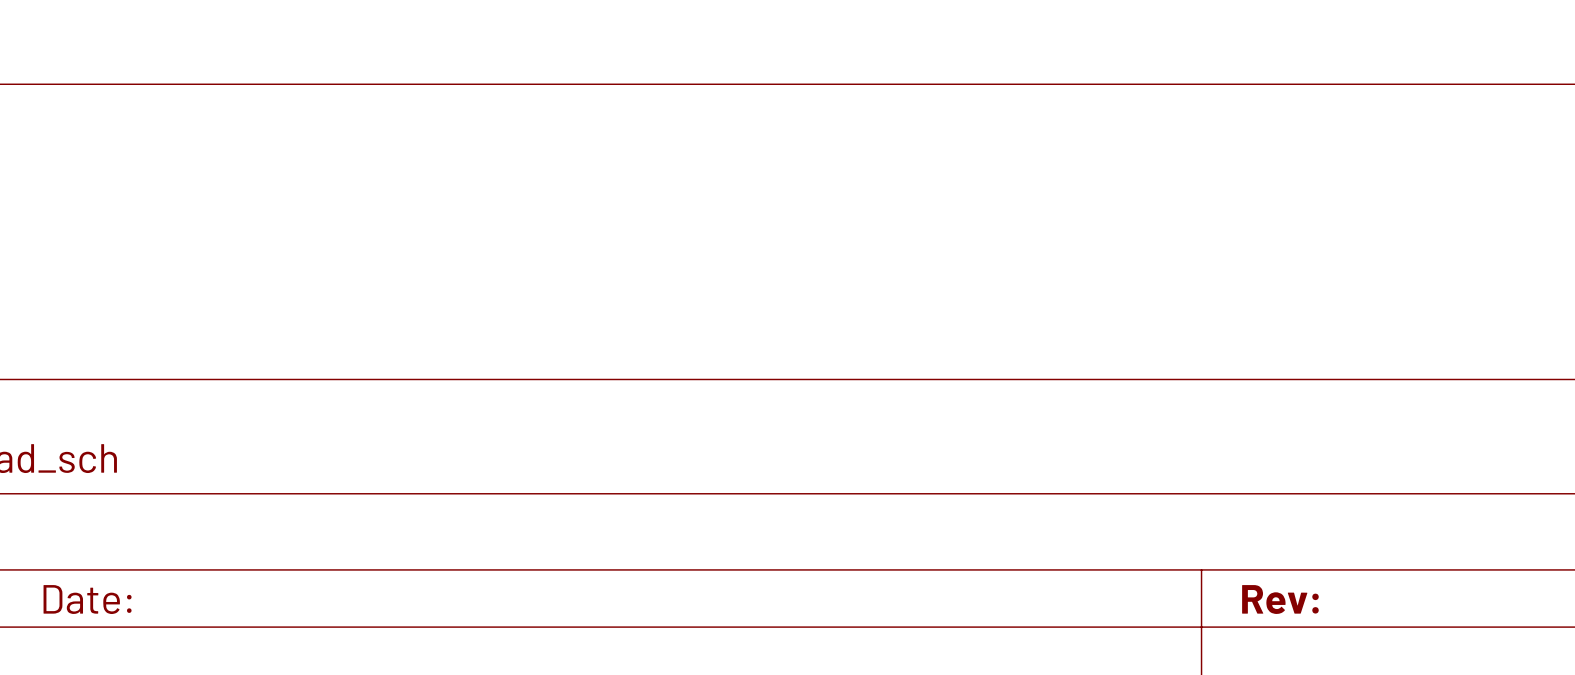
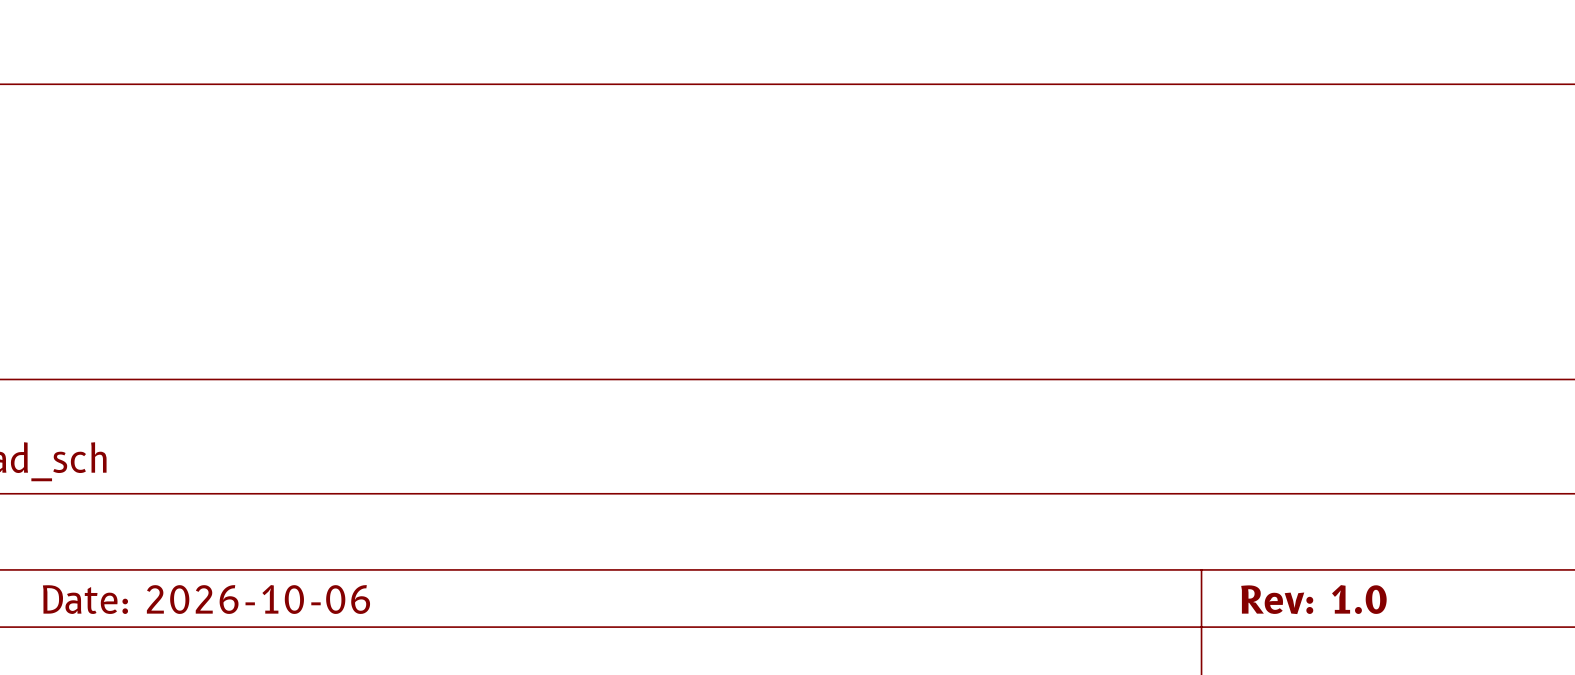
title block: Date: (87, 599) -> Date: 2026-10-06 (206, 599)
title block: Rev: (1280, 599) -> Rev: 1.0 (1313, 599)

